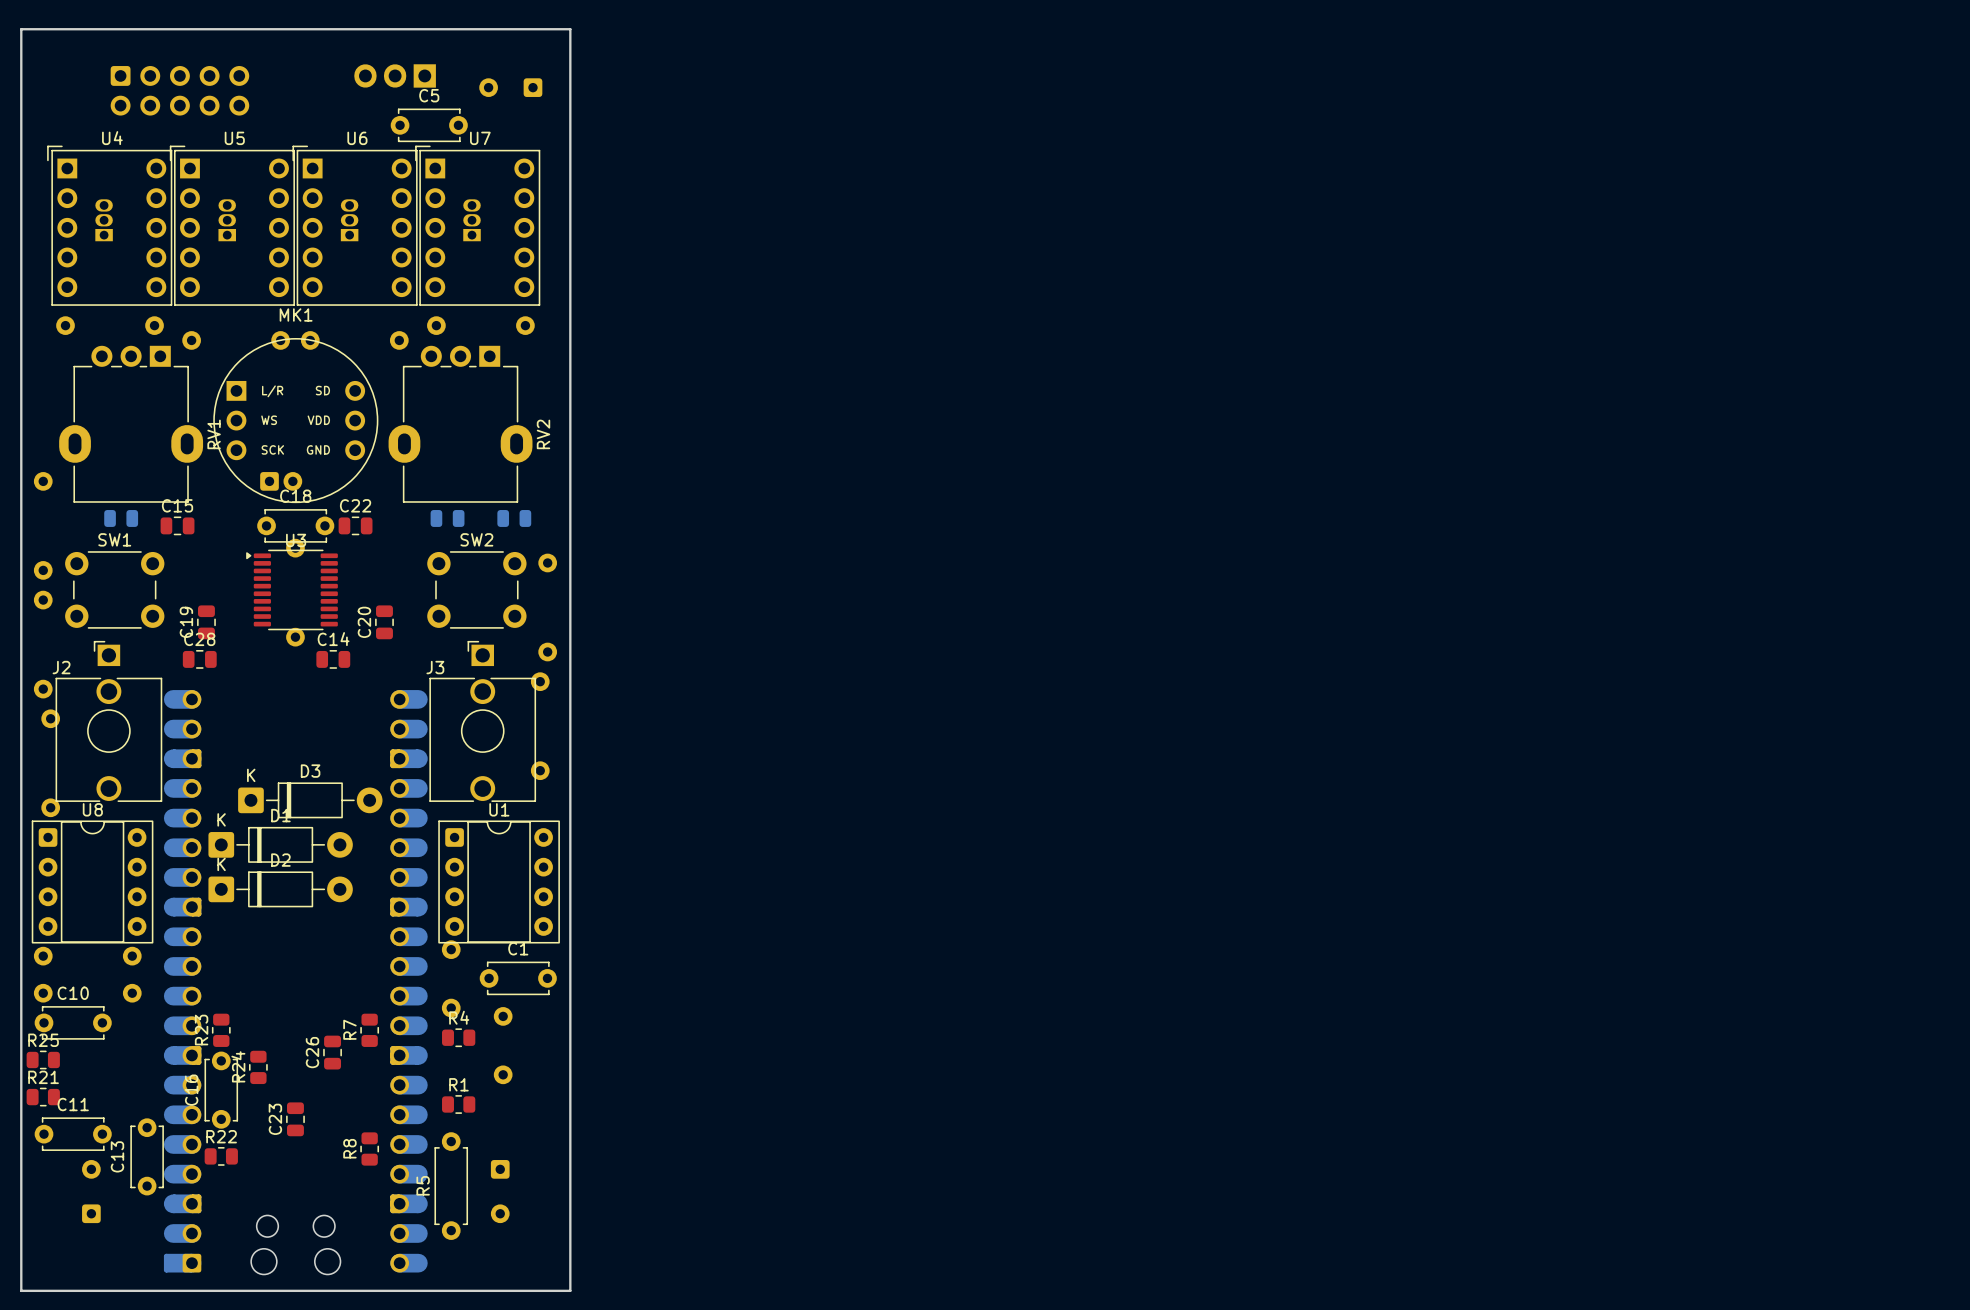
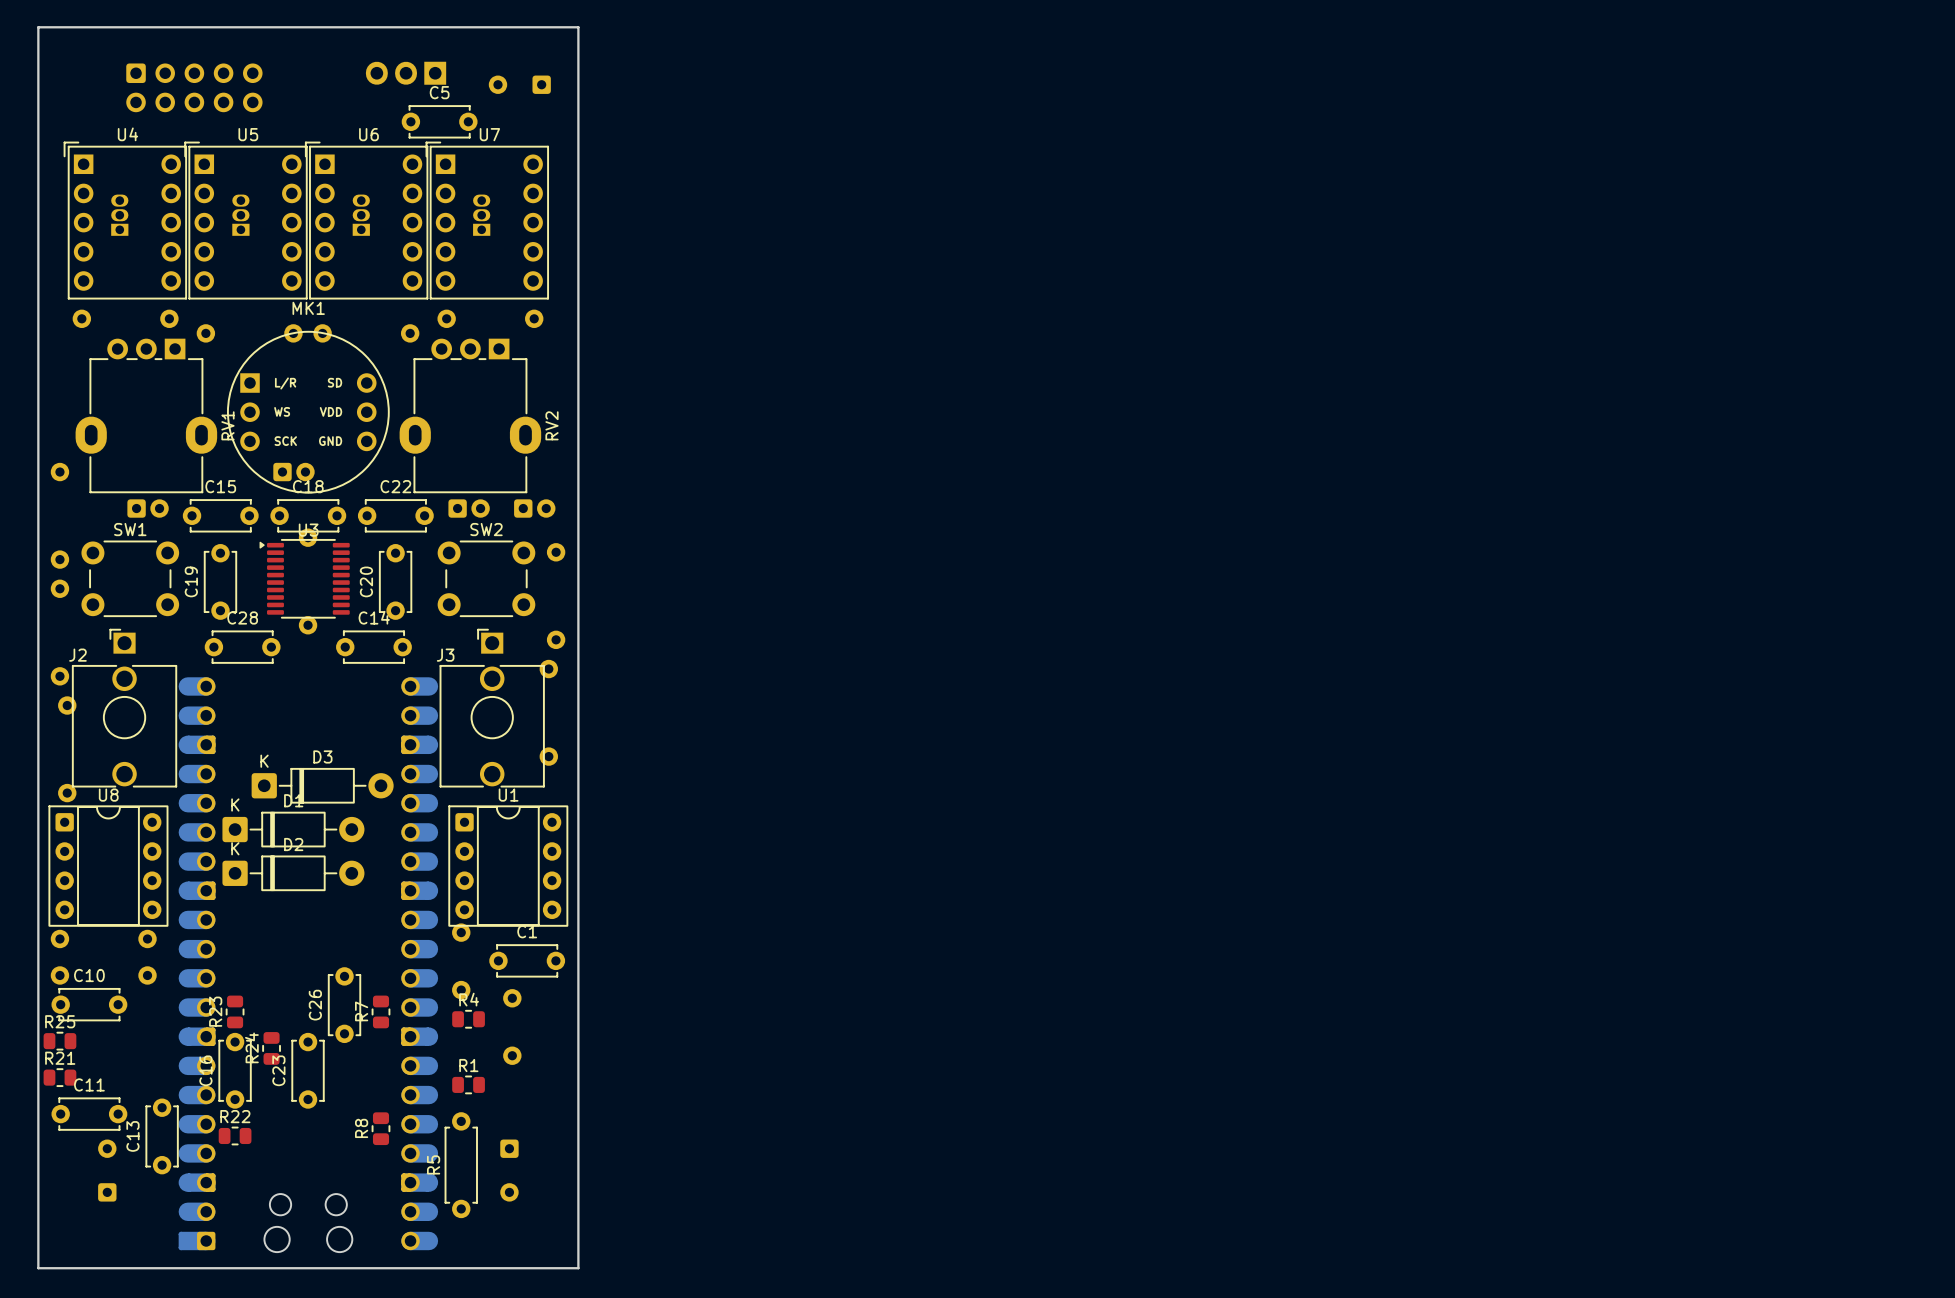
part footprint: [104, 510, 139, 527] -> [127, 499, 169, 518]
part footprint: [430, 510, 465, 527] -> [448, 499, 490, 518]
part footprint: [497, 510, 532, 527] -> [514, 499, 556, 518]
C15 footprint: [160, 516, 195, 536] -> [182, 499, 259, 533]
C22 footprint: [338, 516, 373, 536] -> [357, 499, 434, 533]
C19 footprint: [197, 605, 216, 640] -> [204, 544, 237, 620]
C20 footprint: [375, 605, 394, 640] -> [379, 544, 413, 620]
C28 footprint: [182, 650, 217, 669] -> [204, 630, 281, 664]
C14 footprint: [316, 650, 351, 669] -> [336, 630, 412, 664]
C26 footprint: [323, 1035, 342, 1070] -> [328, 967, 361, 1044]
C23 footprint: [286, 1102, 305, 1137] -> [291, 1032, 325, 1109]

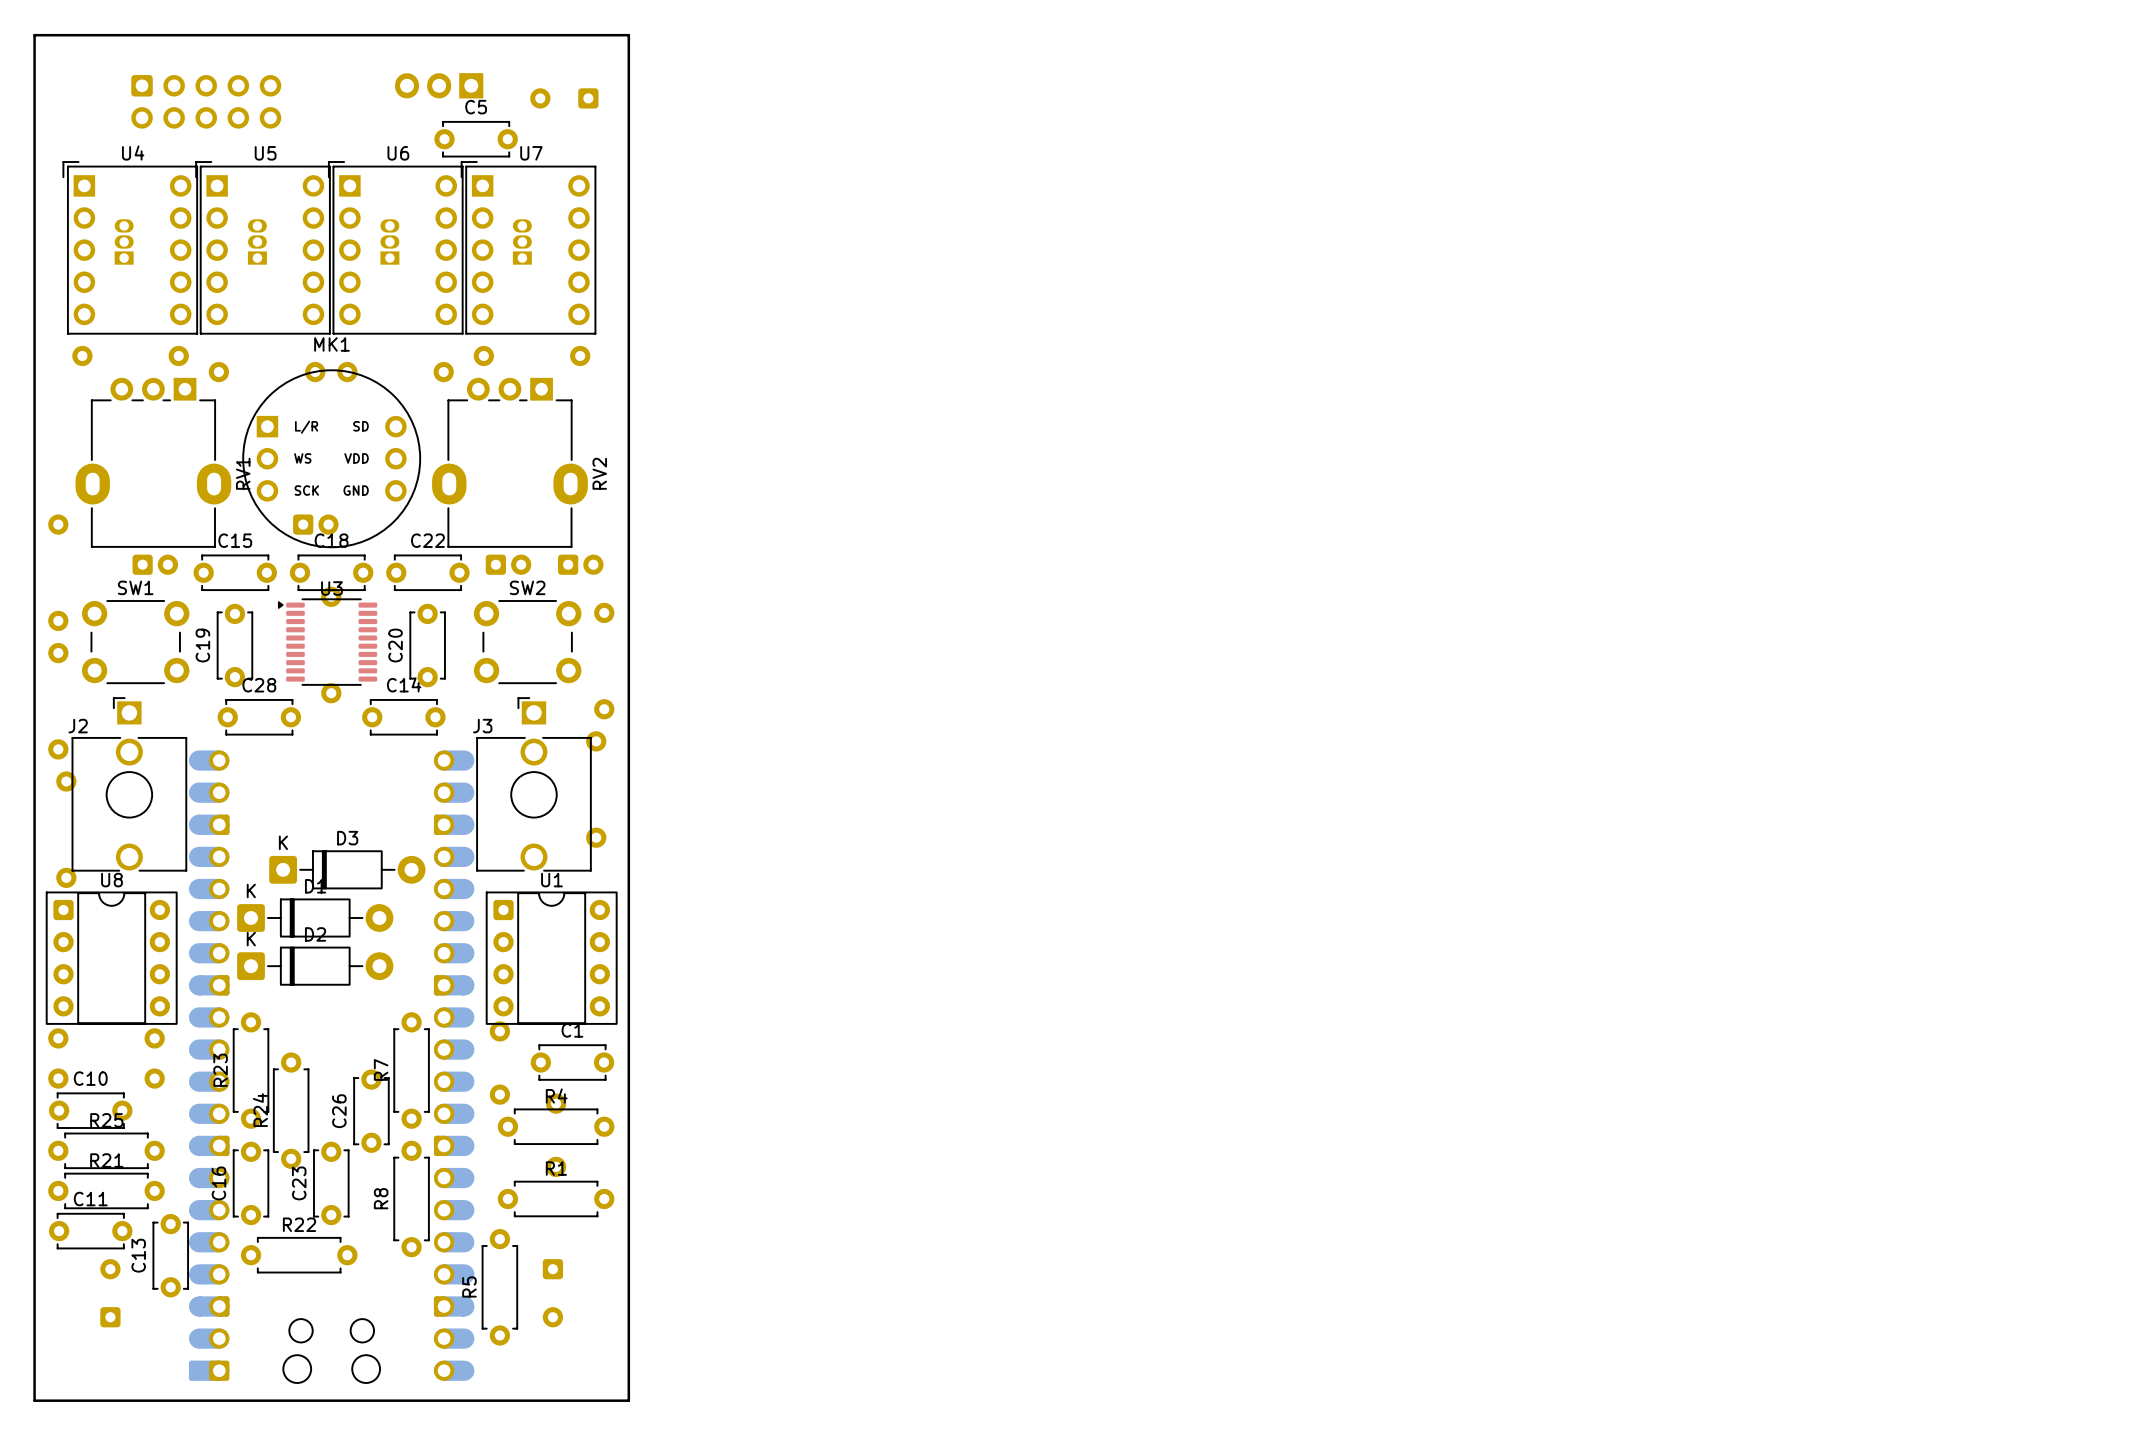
R23 footprint: [225, 995, 245, 1029] -> [232, 1012, 270, 1129]
R7 footprint: [371, 995, 391, 1029] -> [393, 1012, 430, 1129]
R4 footprint: [452, 1010, 485, 1029] -> [497, 1108, 615, 1145]
R25 footprint: [43, 1032, 77, 1051] -> [48, 1132, 165, 1169]
R24 footprint: [262, 1032, 281, 1065] -> [273, 1052, 310, 1169]
R21 footprint: [43, 1068, 77, 1087] -> [48, 1172, 165, 1210]
R1 footprint: [452, 1075, 485, 1095] -> [497, 1180, 615, 1218]
R8 footprint: [371, 1112, 391, 1146] -> [393, 1140, 430, 1258]
R22 footprint: [218, 1126, 252, 1146] -> [240, 1237, 358, 1274]

